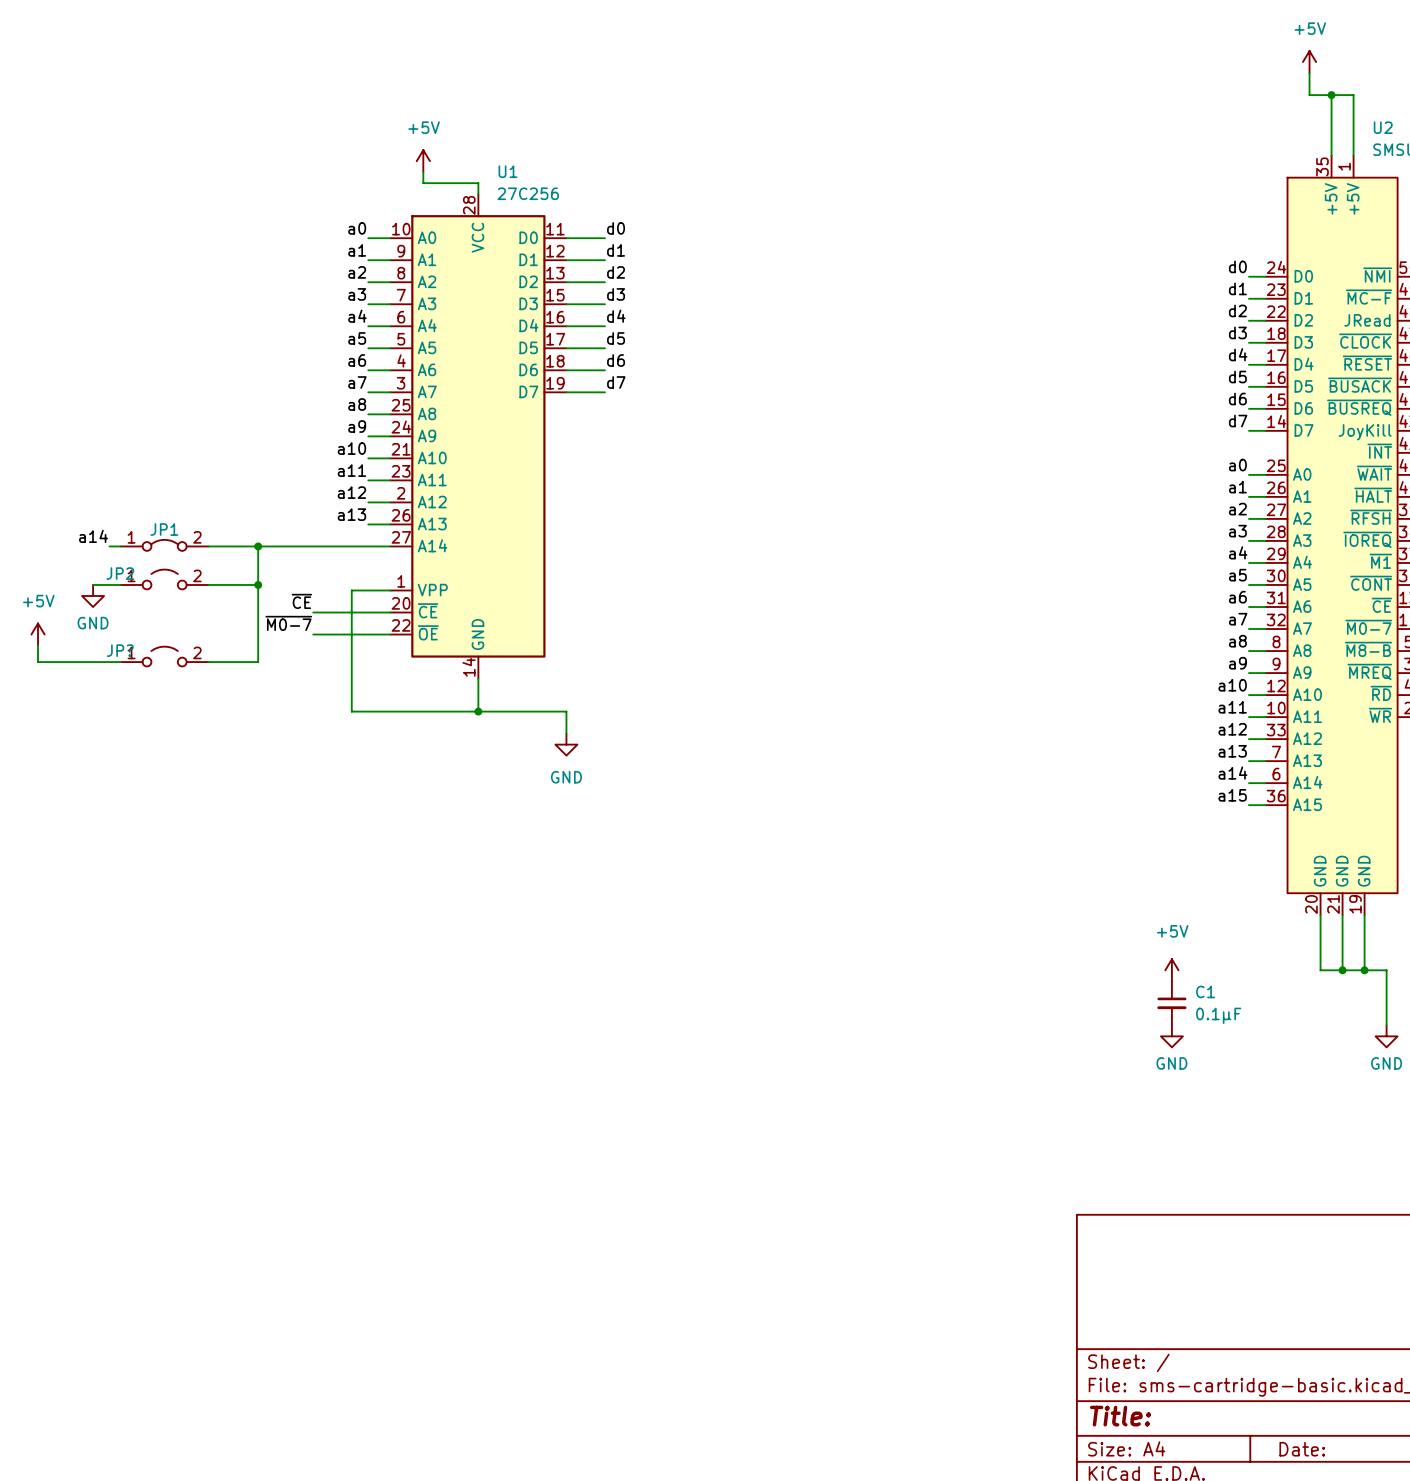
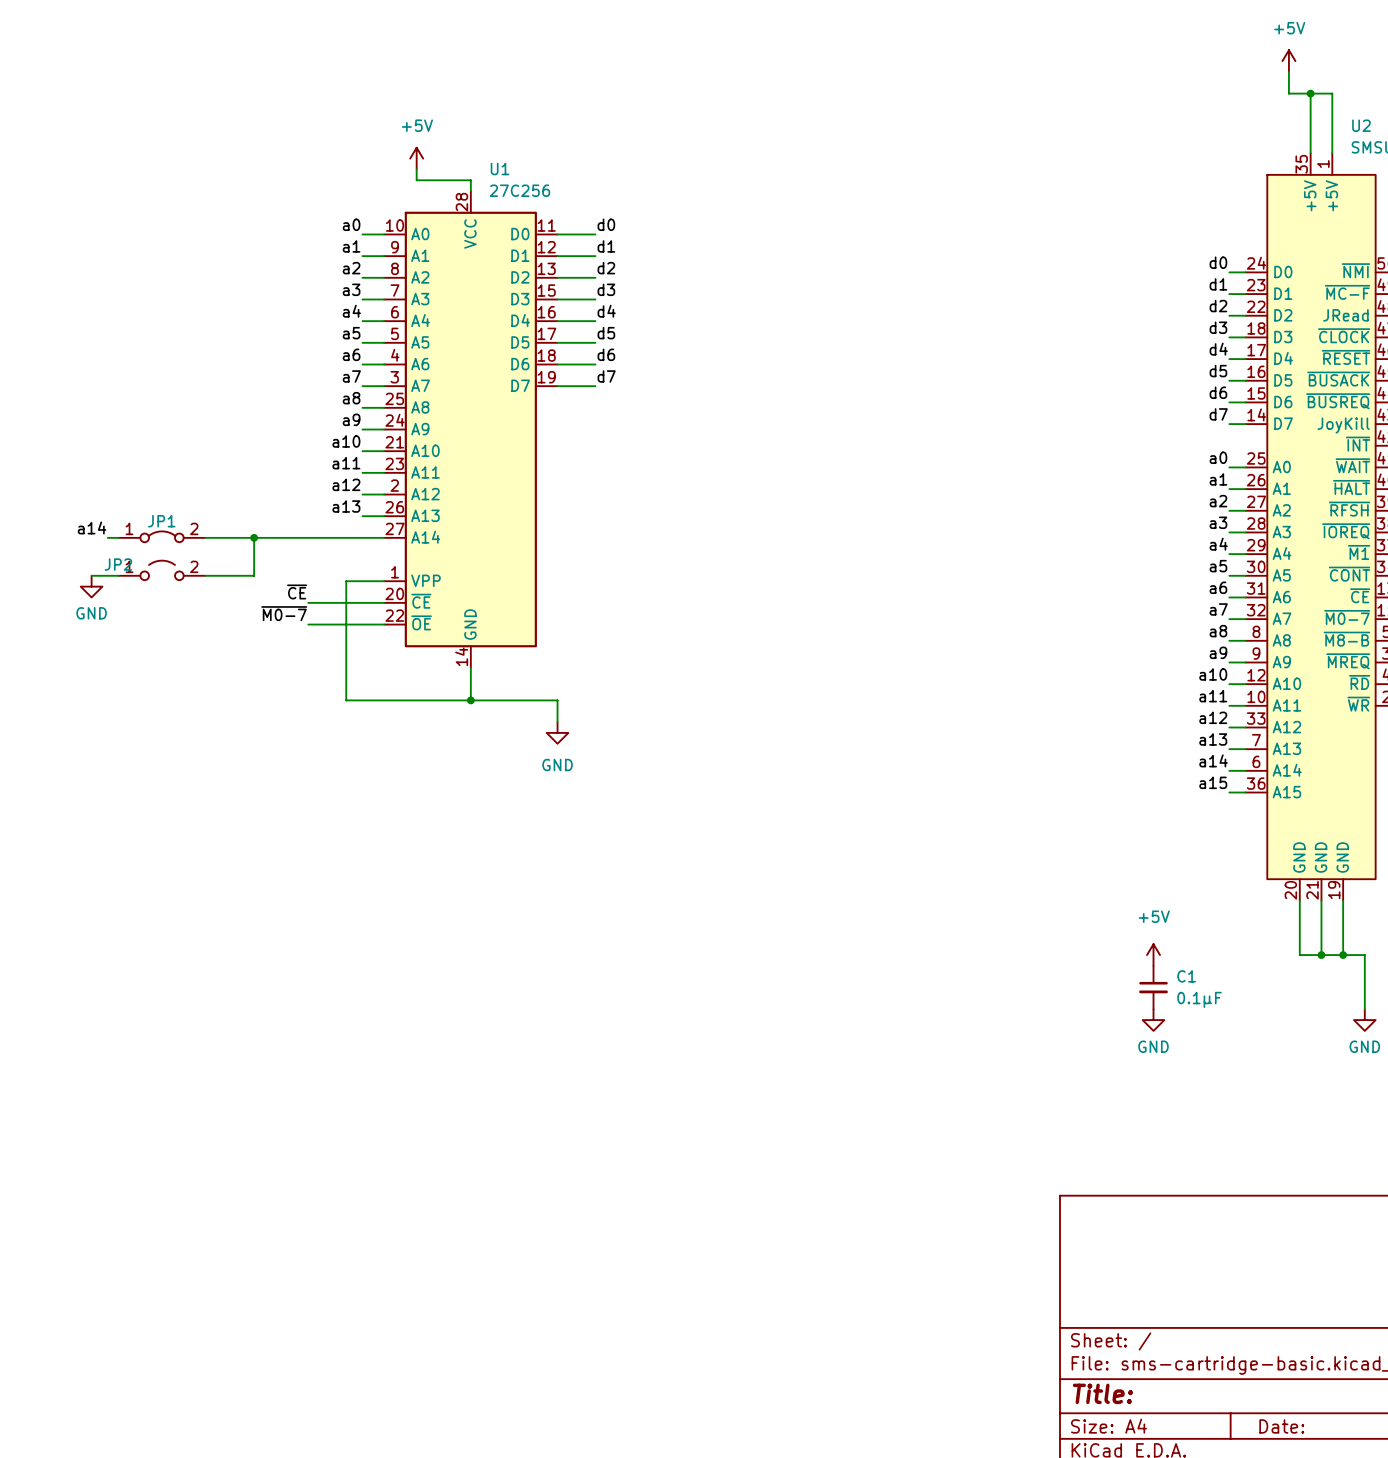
wire: (258, 584) (258, 662) (208, 662) -> none
junction: (258, 584) -> none
power symbol: +5V (38, 634) -> none
wire: (38, 645) (38, 662) (120, 662) -> none
JP?: (164, 656) -> none

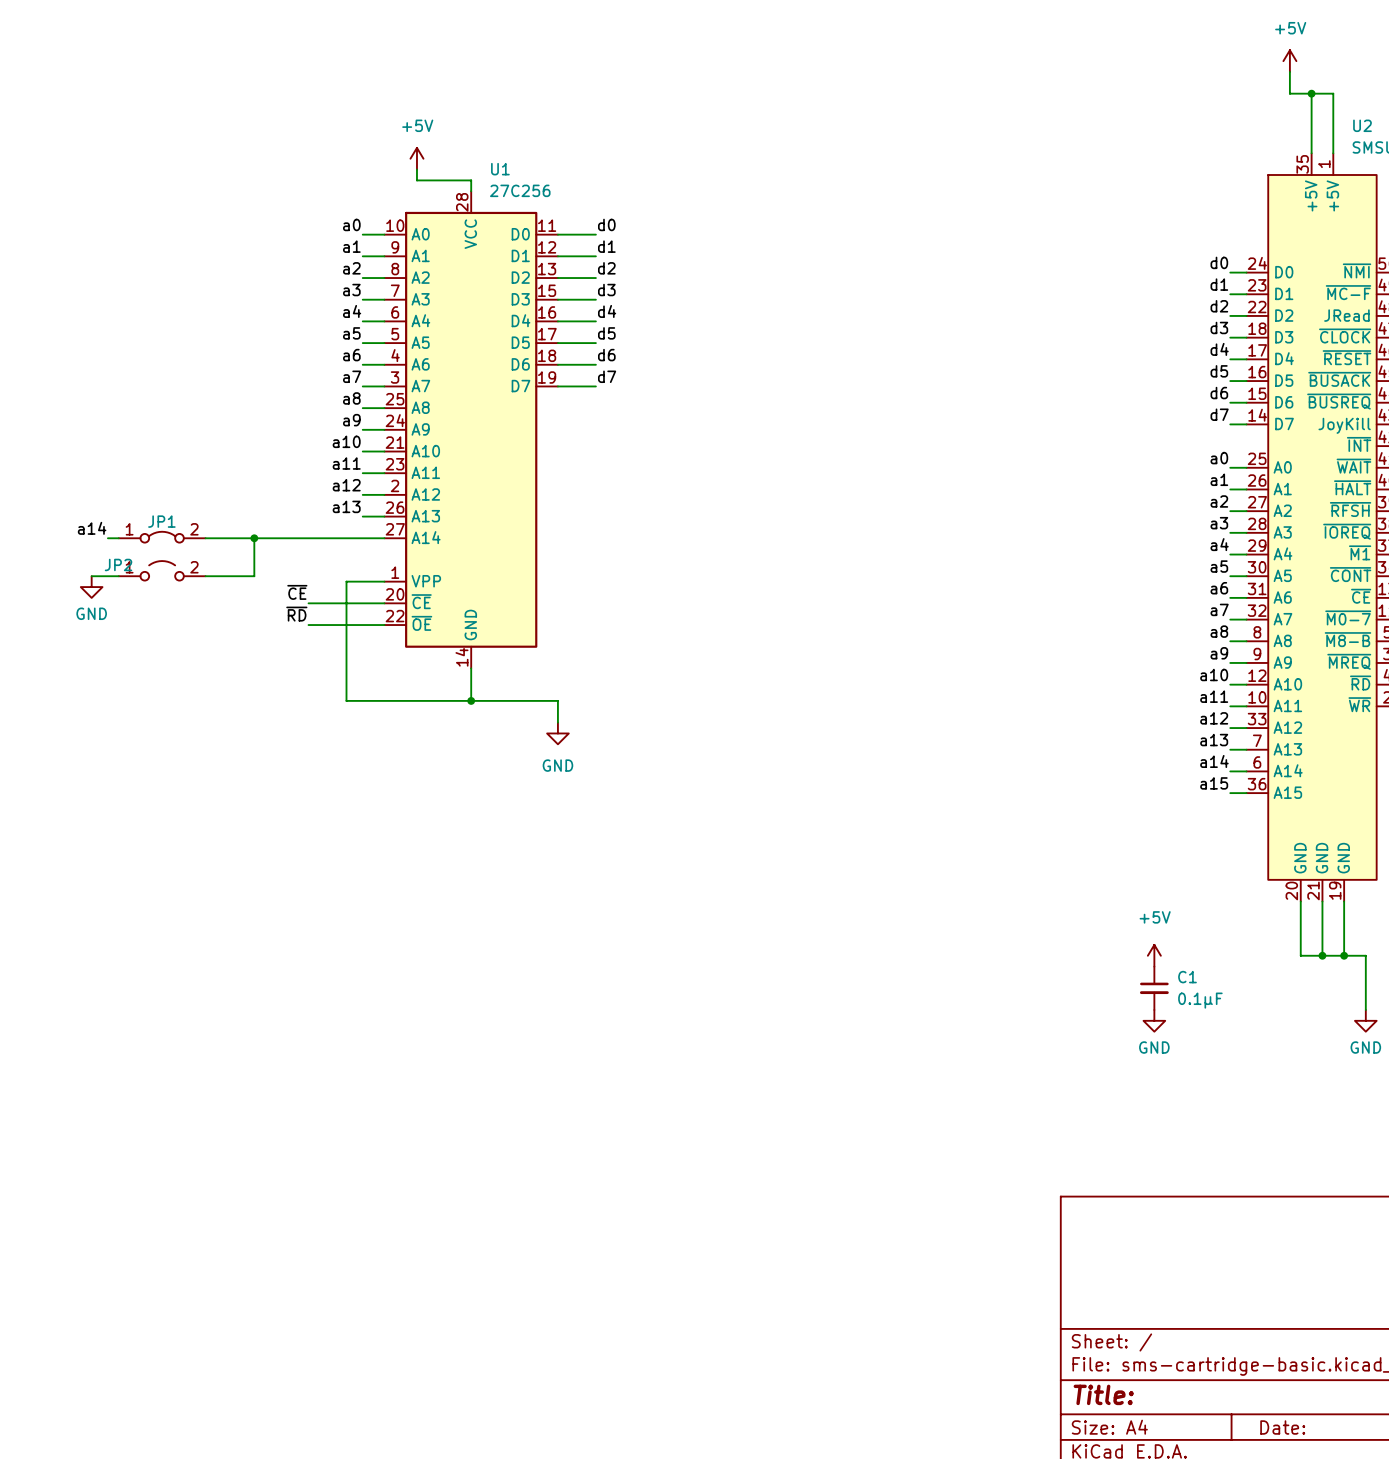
label: ~{M0-7} (284, 613) -> ~{RD} (296, 614)

